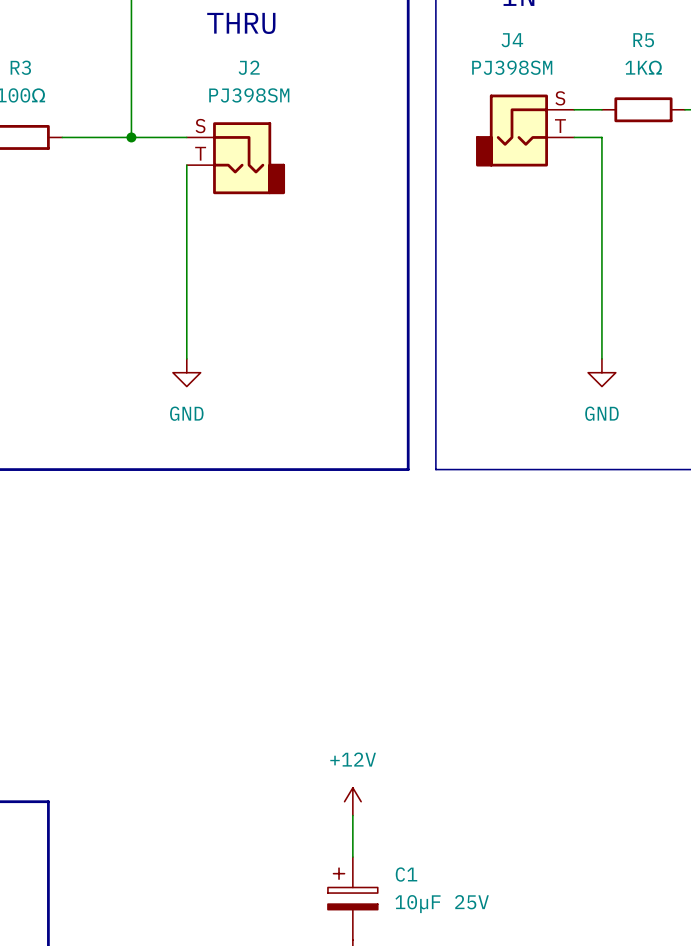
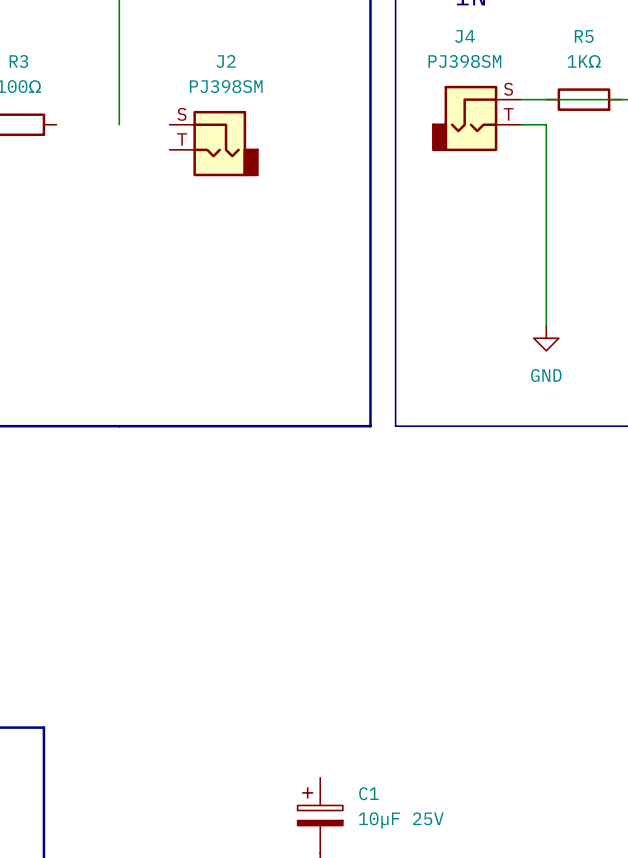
text: THRU (241, 23) -> none
wire: none -> (546, 99) (621, 99)
wire: (62, 137) (186, 137) -> none
junction: (131, 137) -> none
wire: (186, 165) (186, 358) -> none
power symbol: GND (186, 372) -> none
power symbol: +12V (352, 801) -> none
wire: (352, 815) (352, 857) -> none

